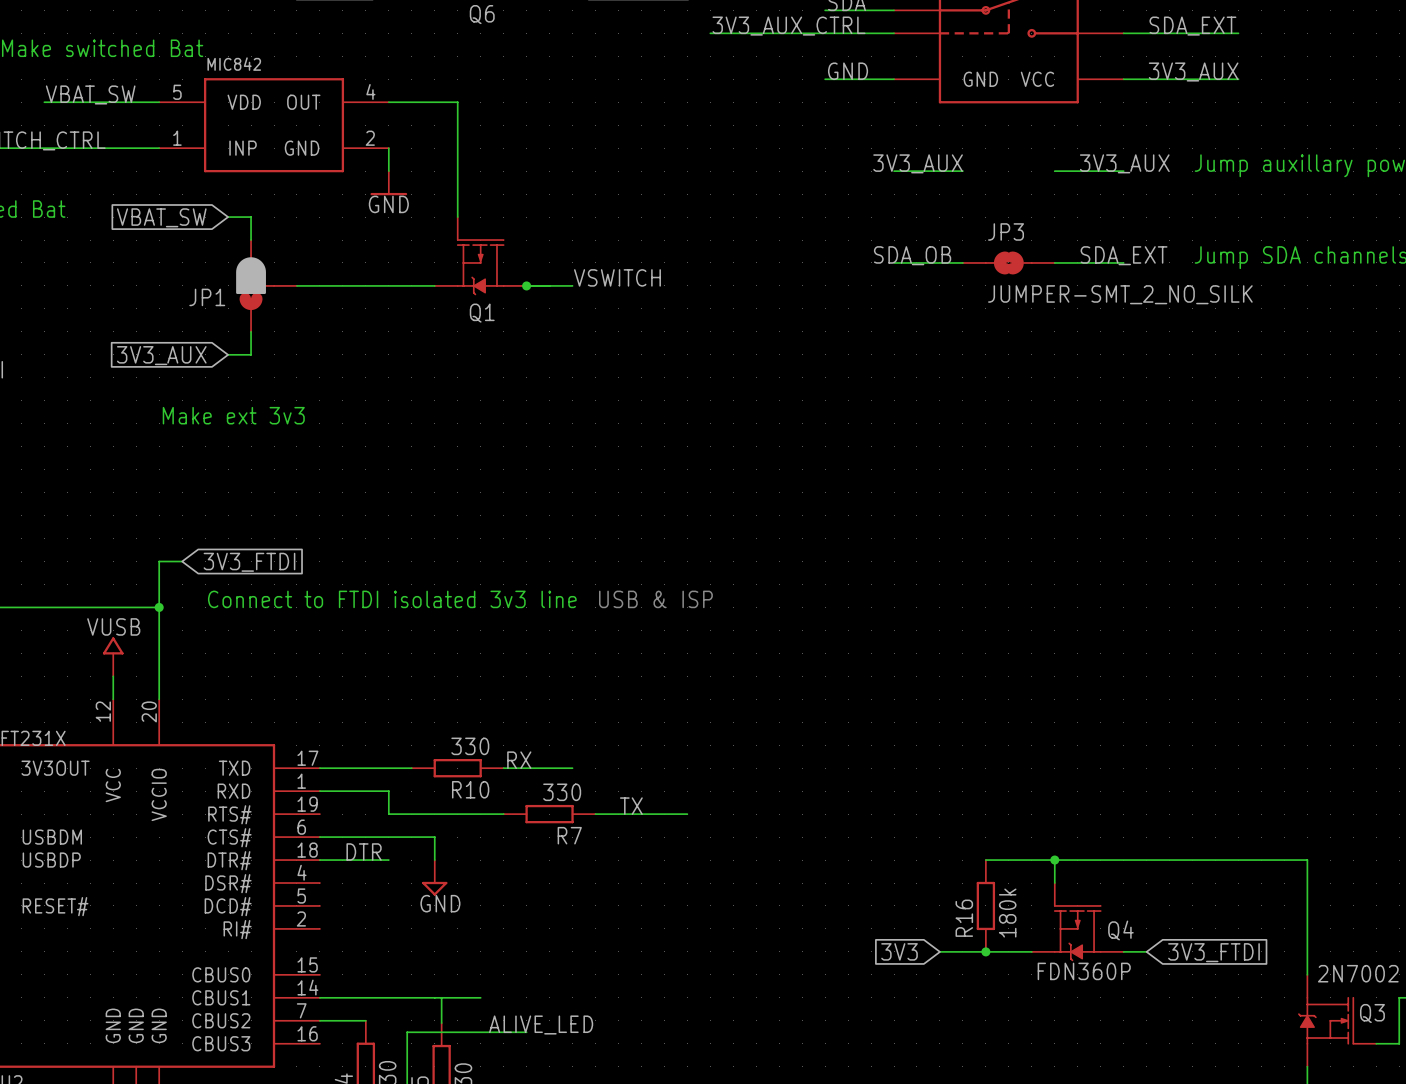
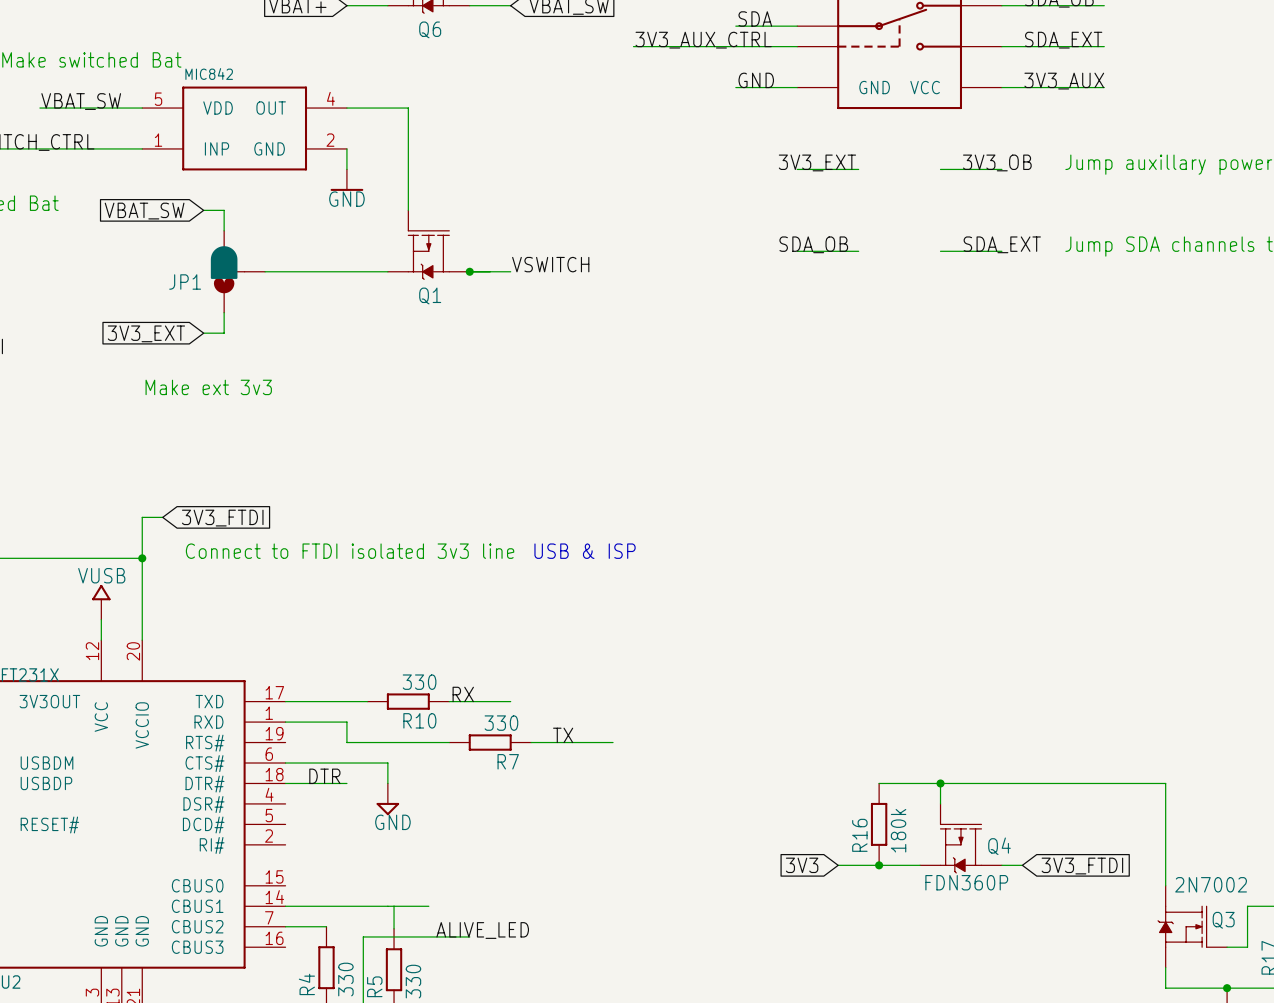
label: 3V3_AUX (918, 163) -> 3V3_EXT (817, 162)
label: 3V3_AUX (1124, 163) -> 3V3_OB (997, 162)
JP3: JUMPER-SMT_2_NO_SILK (1008, 262) -> none
global label: 3V3_AUX (161, 355) -> 3V3_EXT (146, 333)

